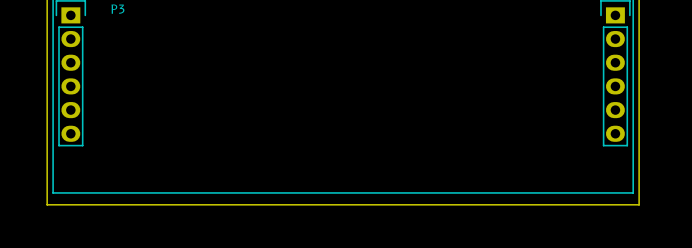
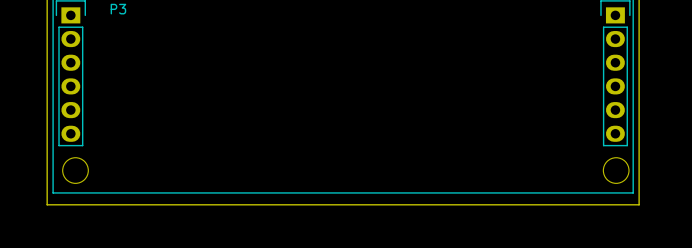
round board edge: none -> [62, 157, 89, 184]
round board edge: none -> [602, 157, 630, 184]

